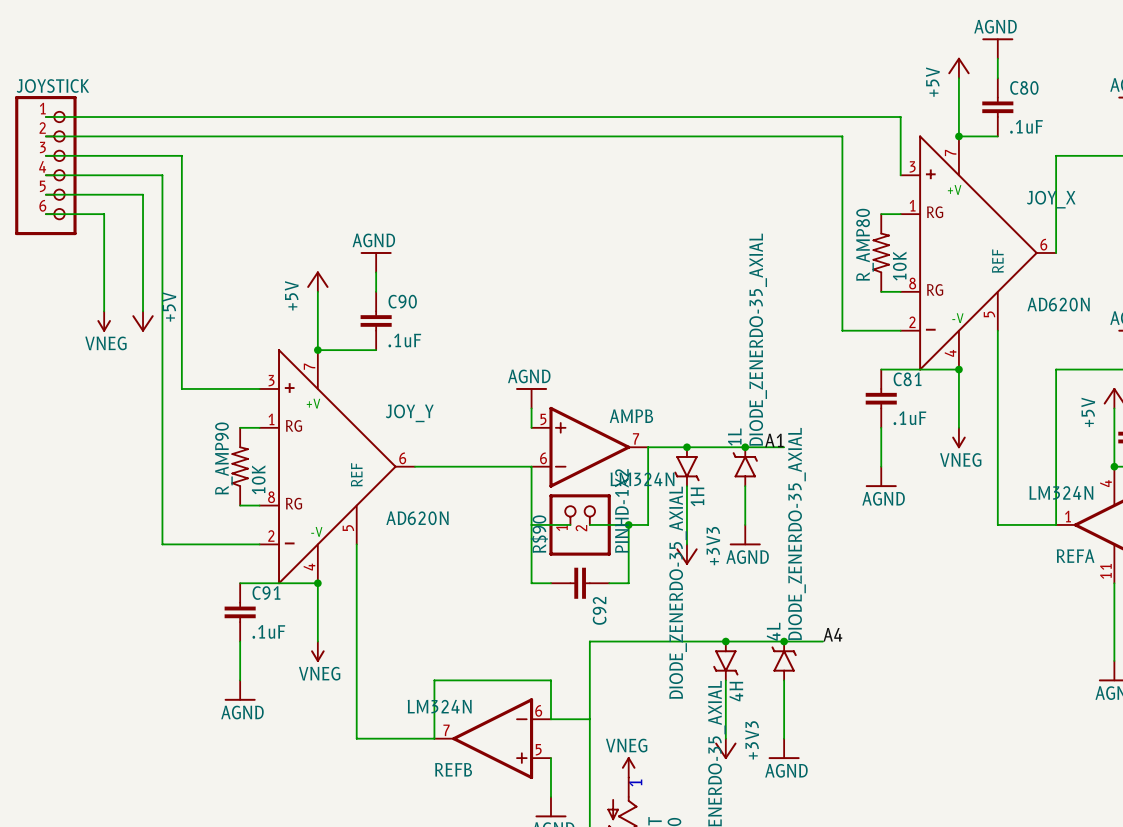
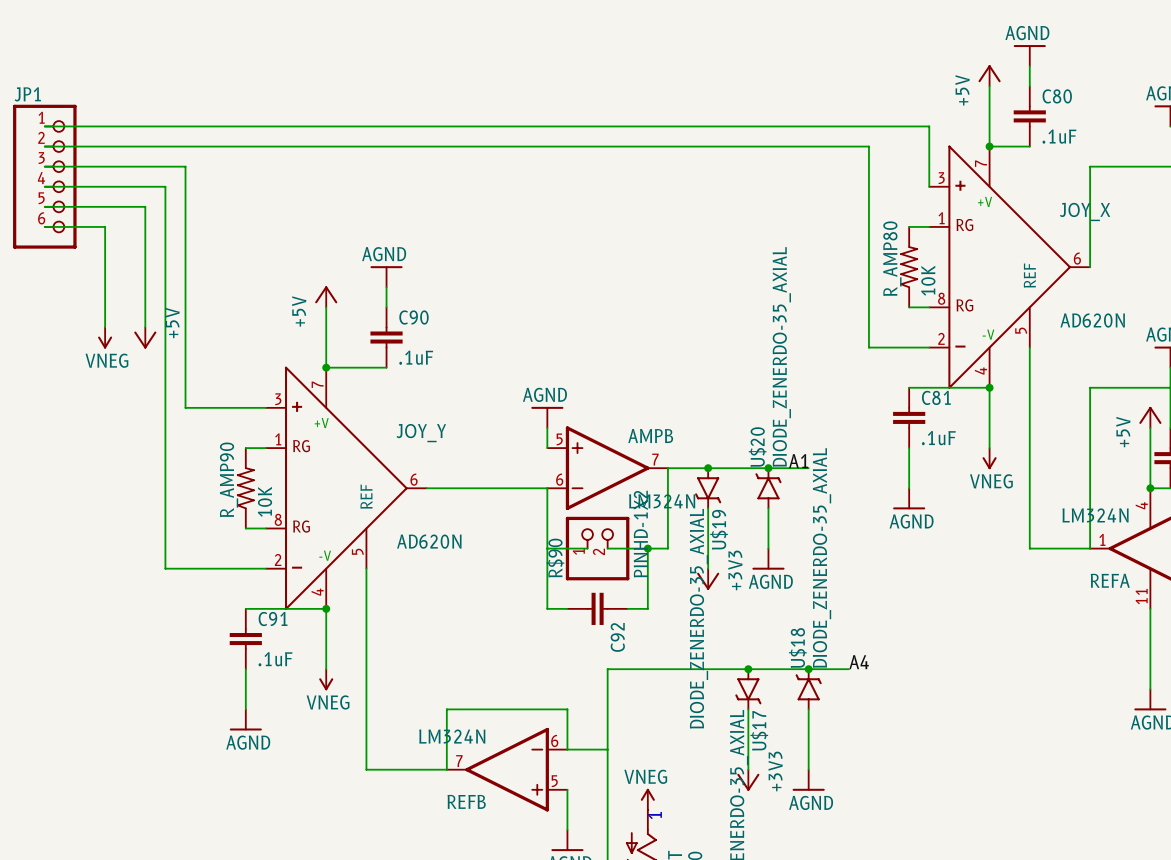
JOYSTICK name: JOYSTICK (52, 85) -> JP1 (27, 94)
1L name: 1L (734, 437) -> U$20 (757, 447)
1H name: 1H (697, 496) -> U$19 (719, 529)
4L name: 4L (773, 631) -> U$18 (797, 648)
4H name: 4H (736, 691) -> U$17 (759, 730)

